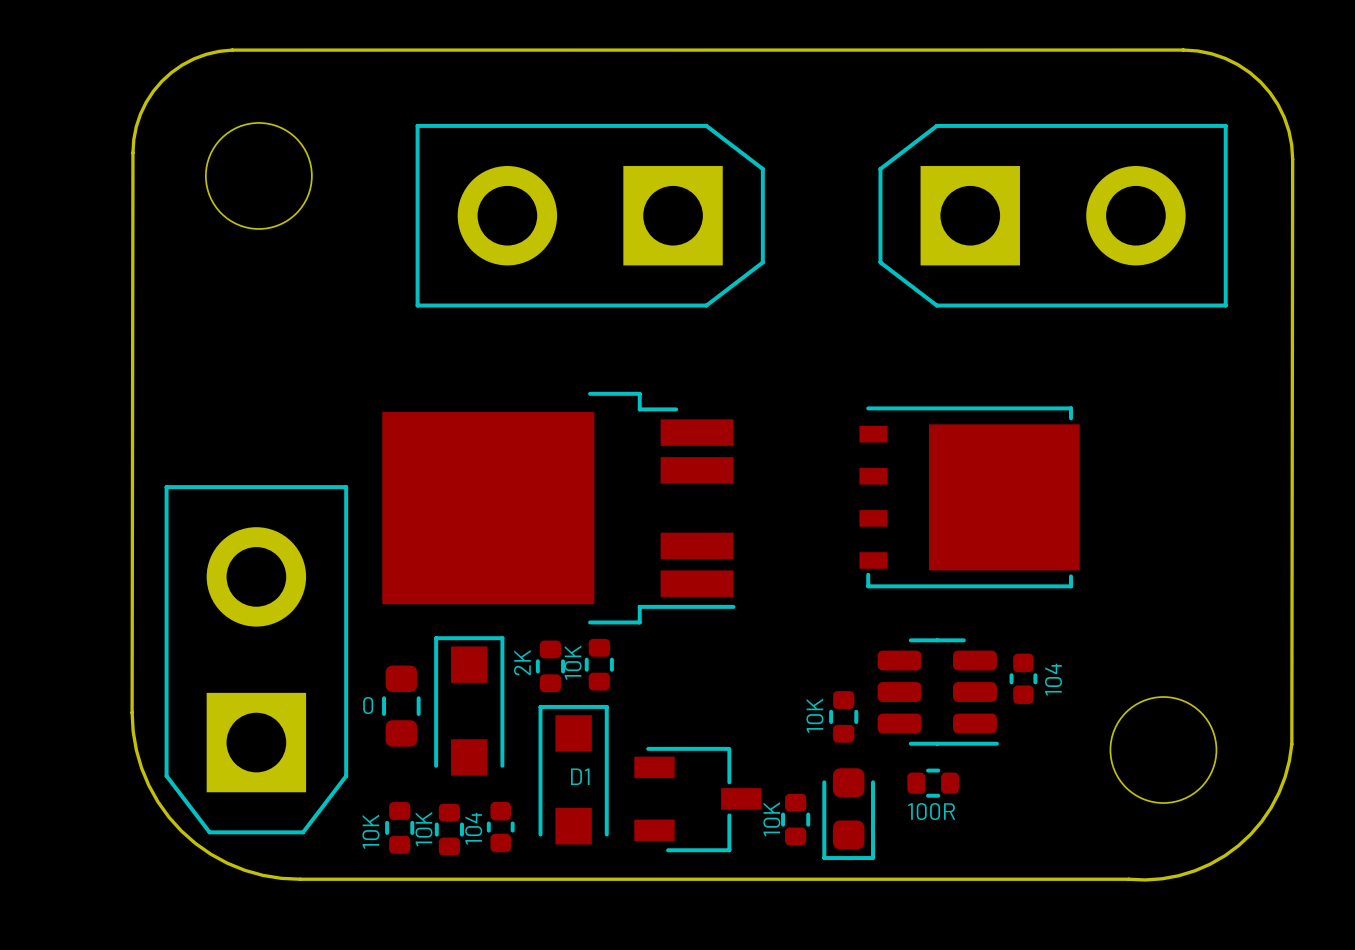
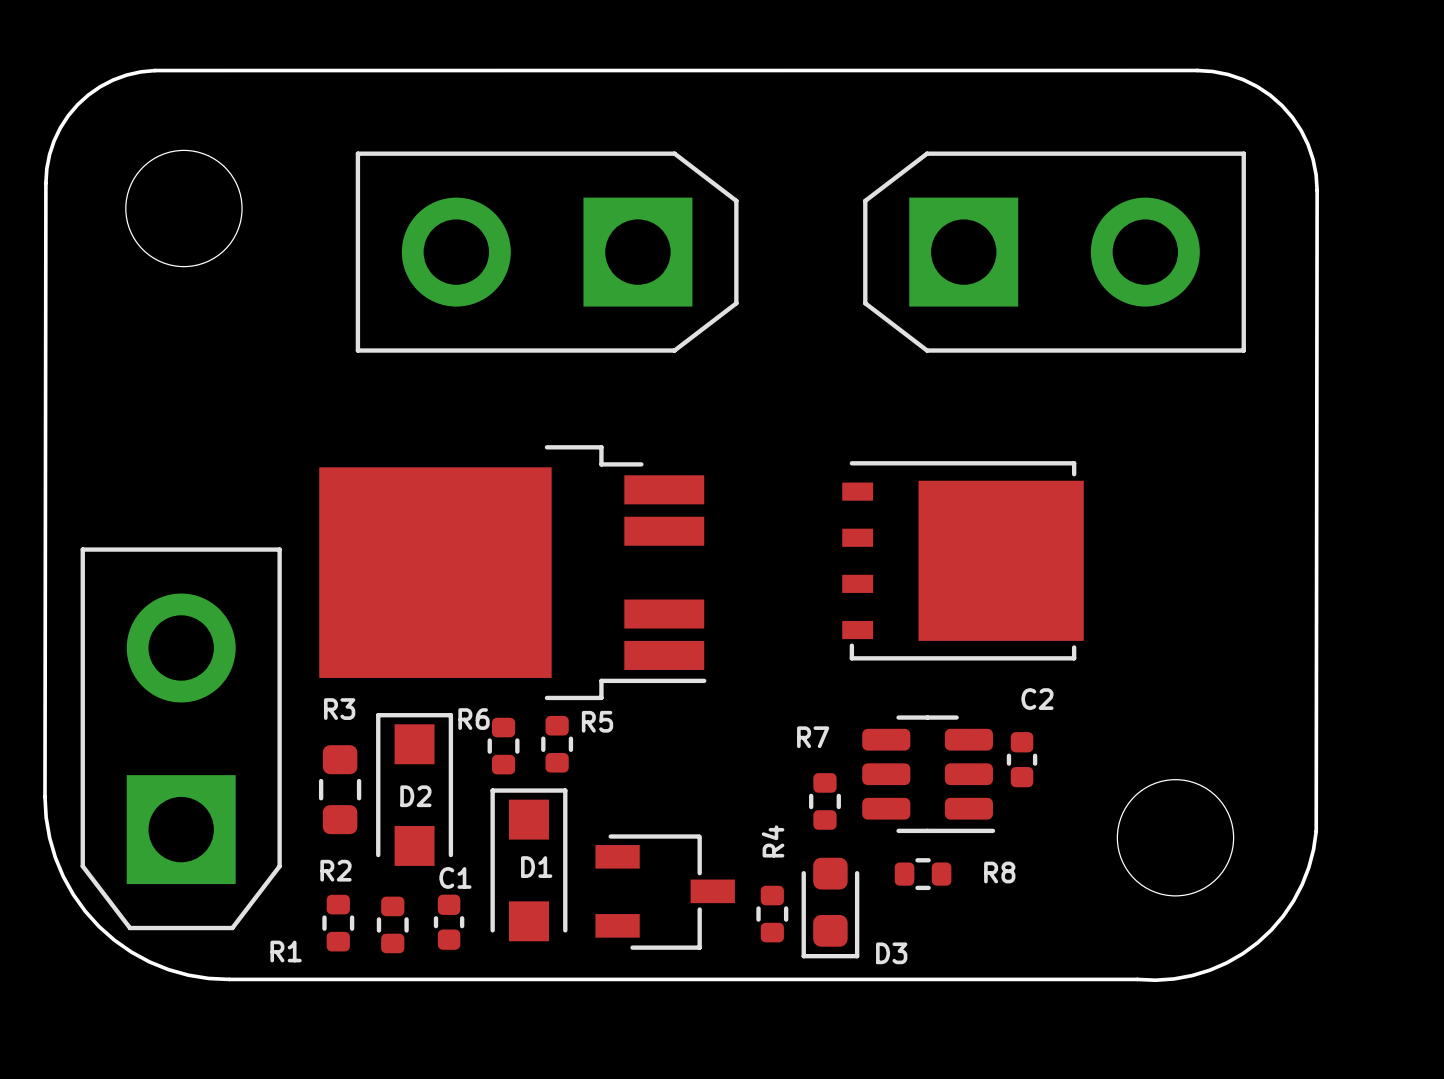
2K name: 2K (522, 662) -> R6 (474, 719)
10K name: 10K (573, 662) -> R5 (597, 721)
104 name: 104 (1053, 679) -> C2 (1037, 699)
0 name: 0 (368, 705) -> R3 (339, 709)
D2 name: none -> D2 (415, 796)
10K name: 10K (814, 715) -> R7 (813, 737)
100R name: 100R (931, 811) -> R8 (999, 872)
10K name: 10K (771, 819) -> R4 (773, 841)
104 name: 104 (473, 828) -> C1 (455, 877)
10K name: 10K (423, 829) -> R2 (335, 870)
10K name: 10K (370, 831) -> R1 (286, 951)
D3 name: none -> D3 (891, 953)

